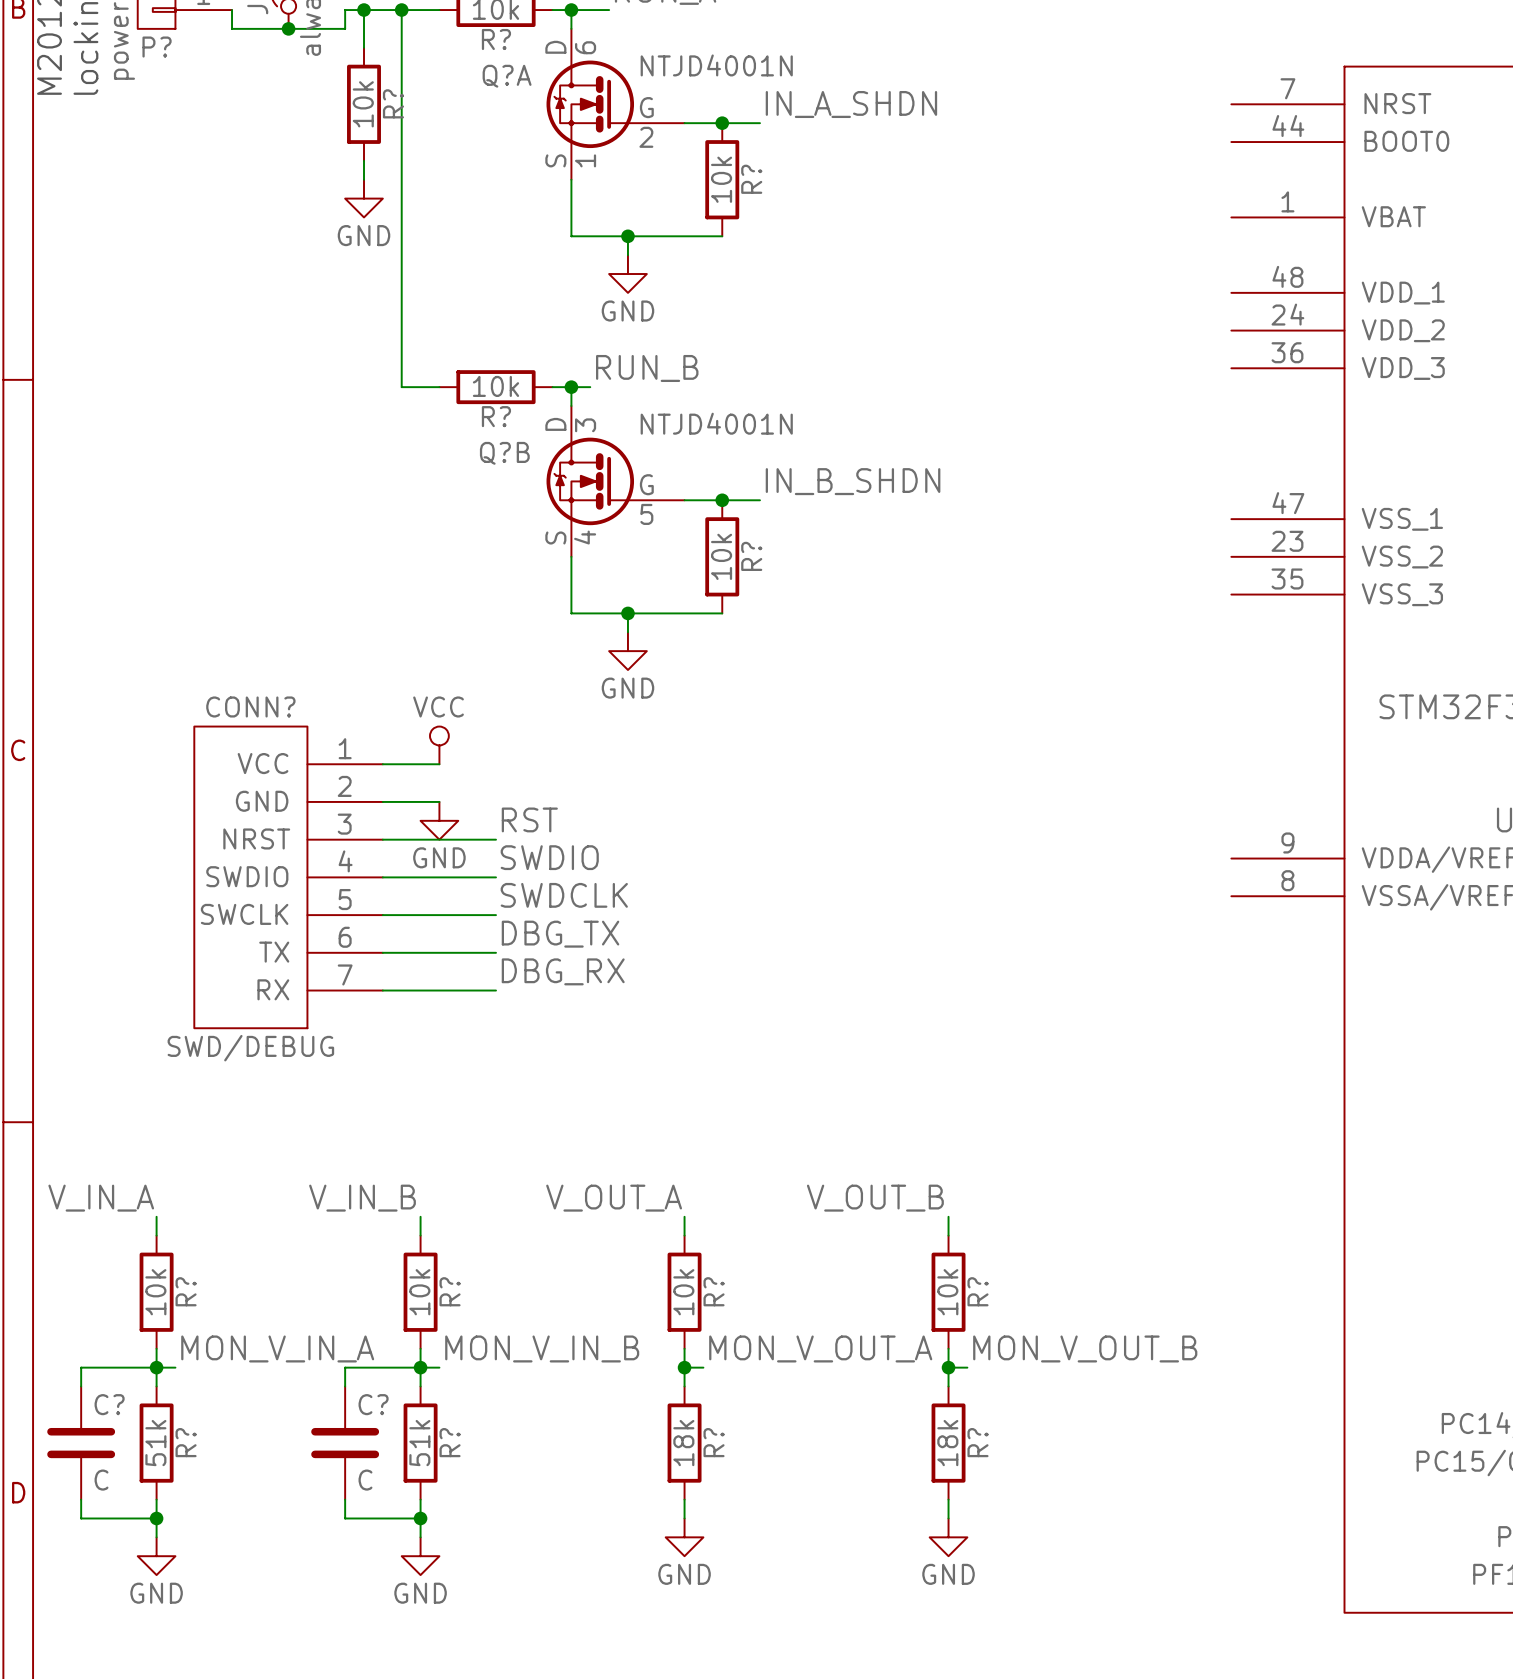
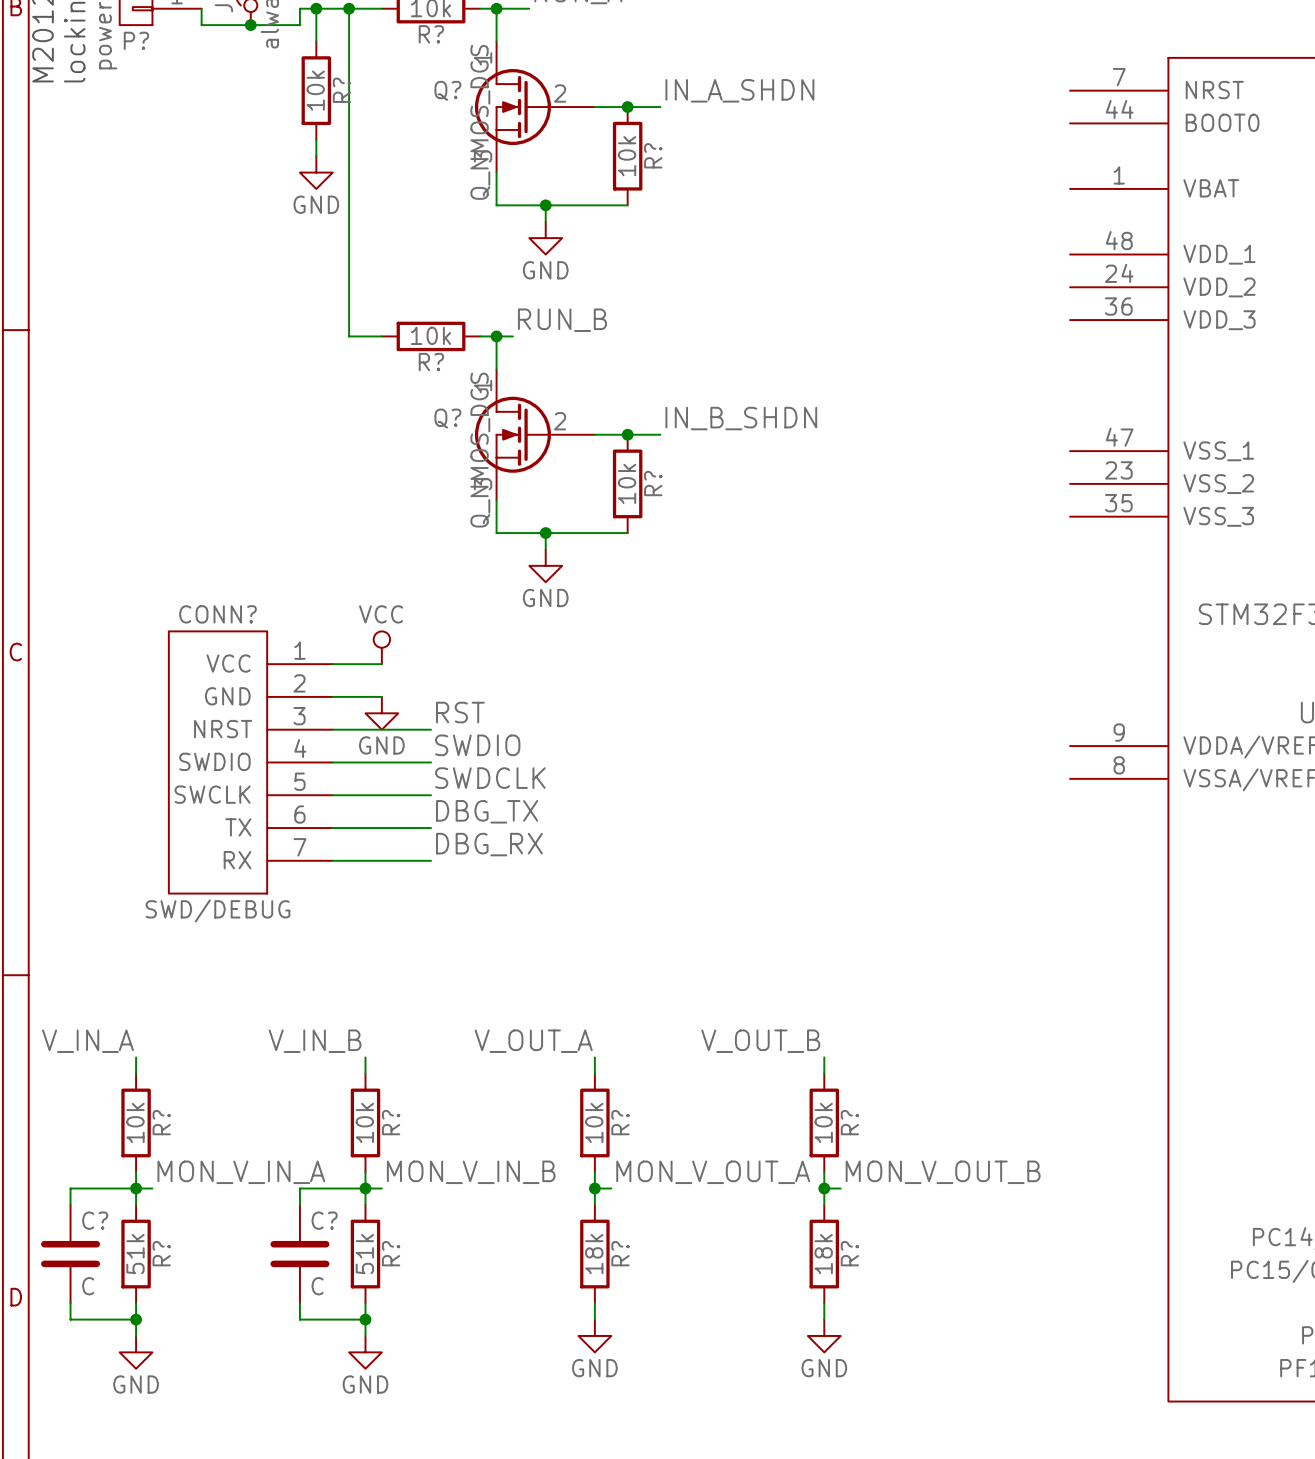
Q?A: NTJD4001N (615, 104) -> none
Q?: none -> Q_NMOS_DGS (534, 107)
Q?B: NTJD4001N (615, 481) -> none
Q?: none -> Q_NMOS_DGS (534, 434)

